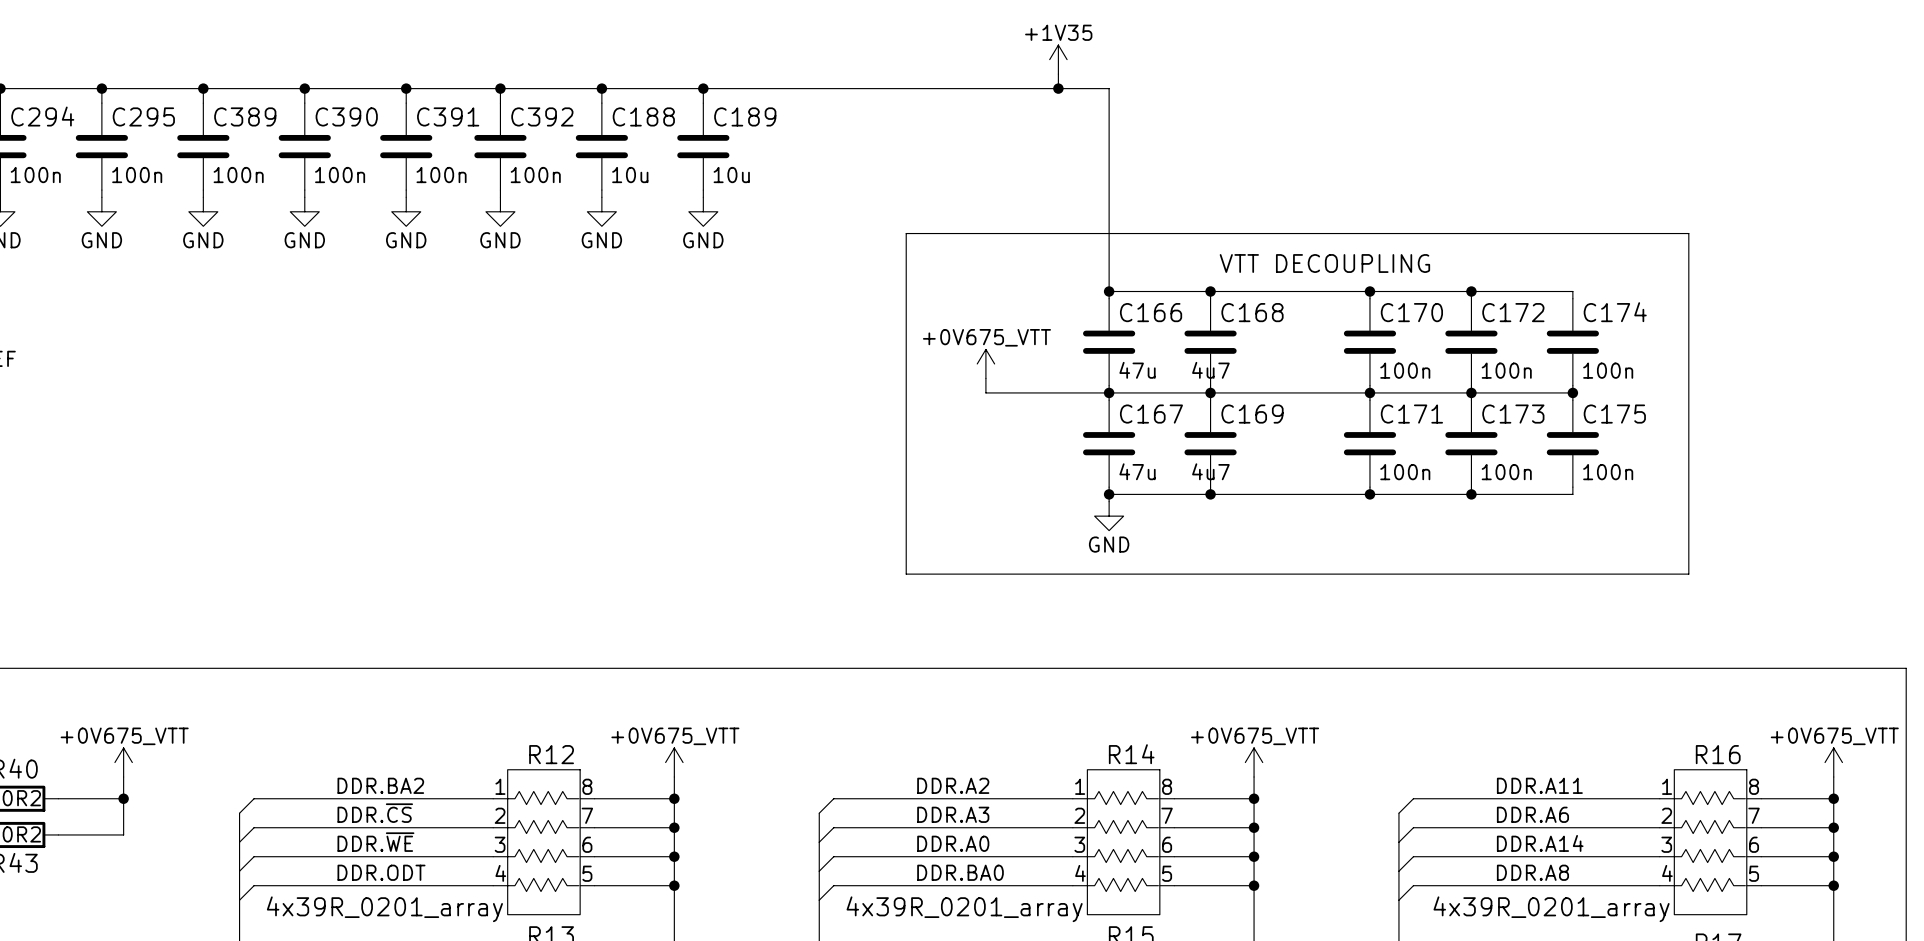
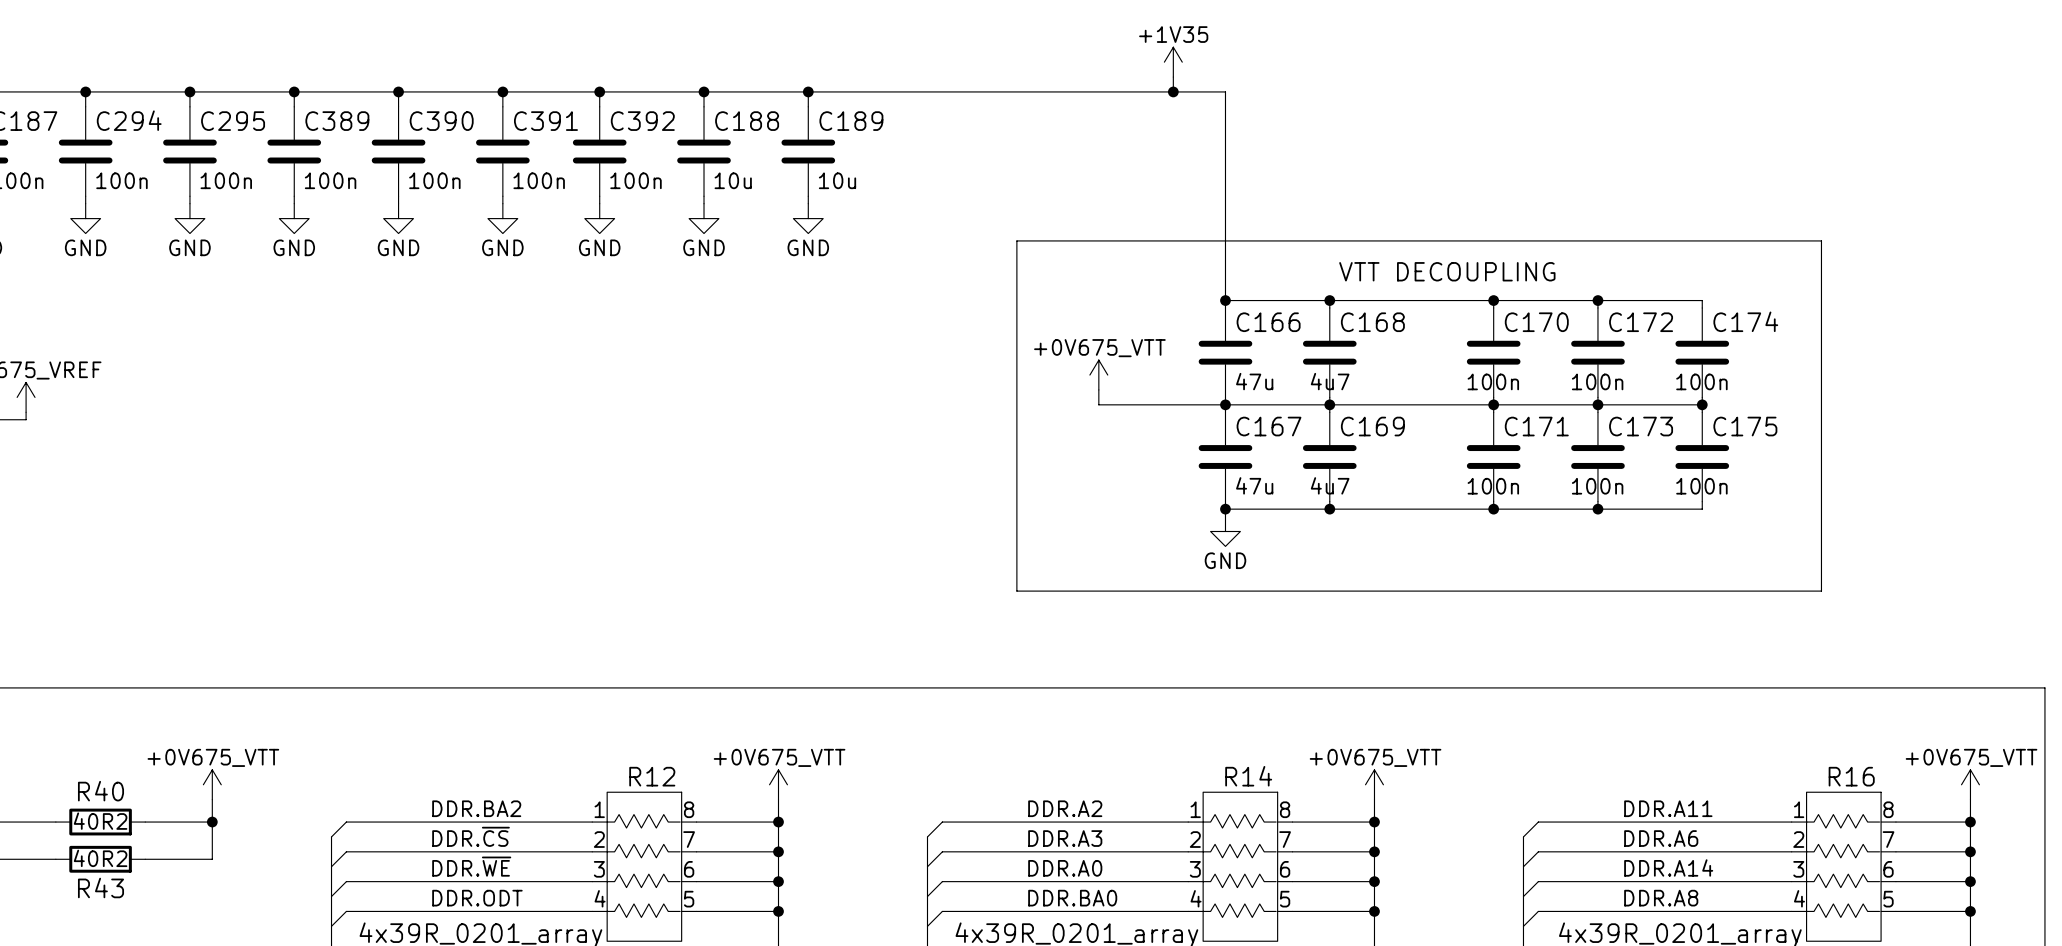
C170 text position: 100n (1405, 370) -> 100n (1493, 381)
C172 text position: 100n (1506, 370) -> 100n (1597, 381)
C174 text position: 100n (1608, 370) -> 100n (1701, 381)
C171 text position: 100n (1405, 472) -> 100n (1493, 486)
C173 text position: 100n (1506, 472) -> 100n (1597, 486)
C175 text position: 100n (1608, 472) -> 100n (1701, 486)

